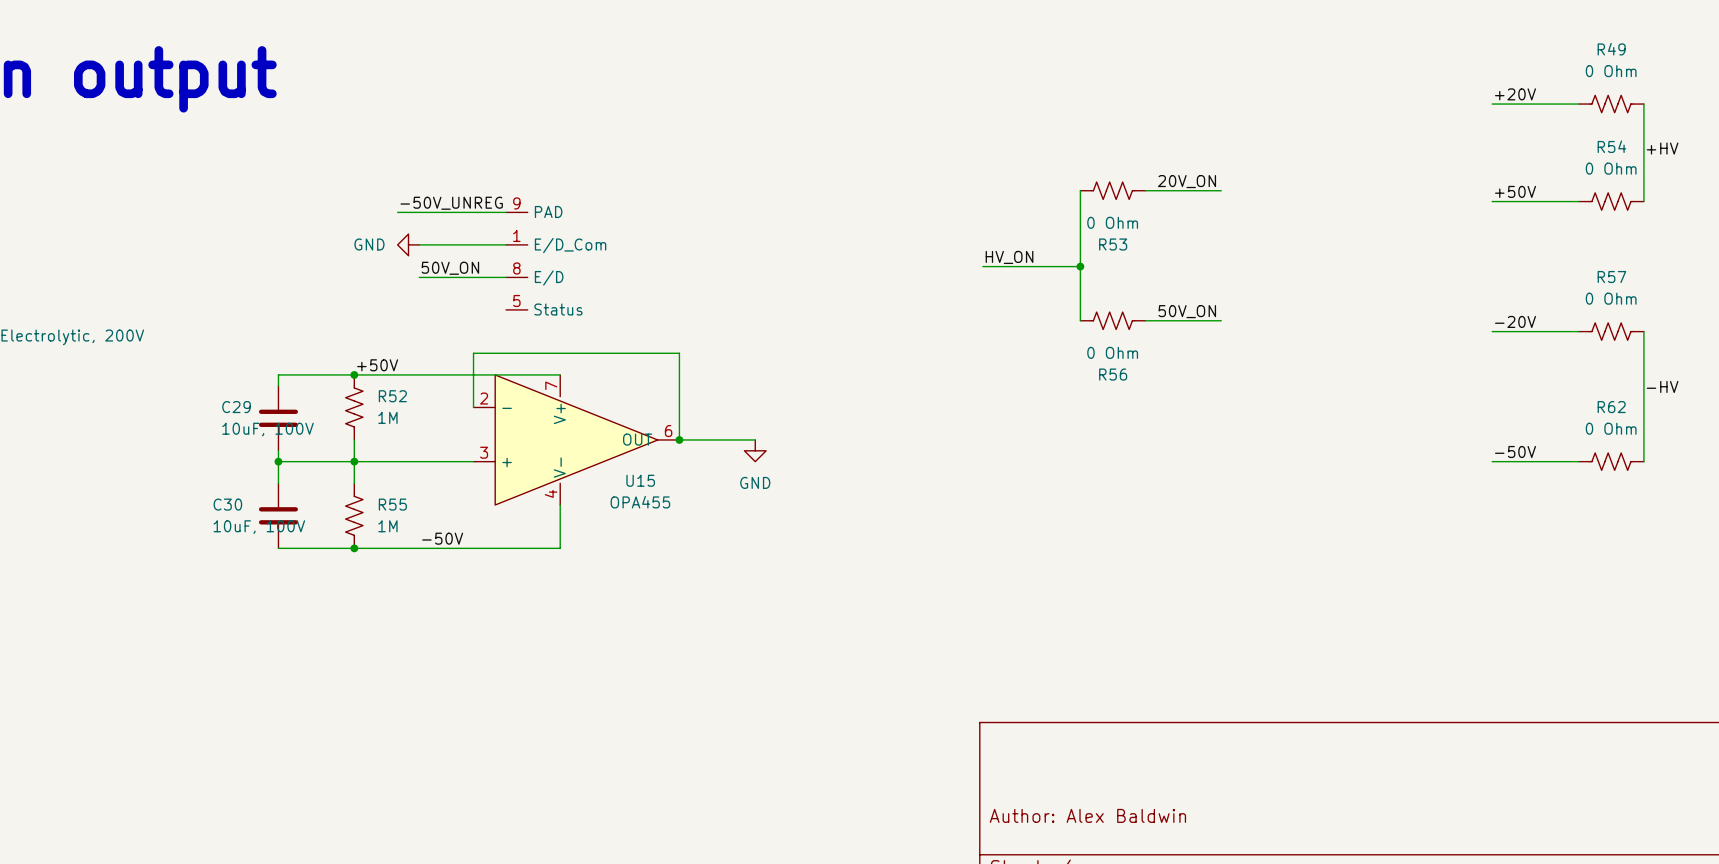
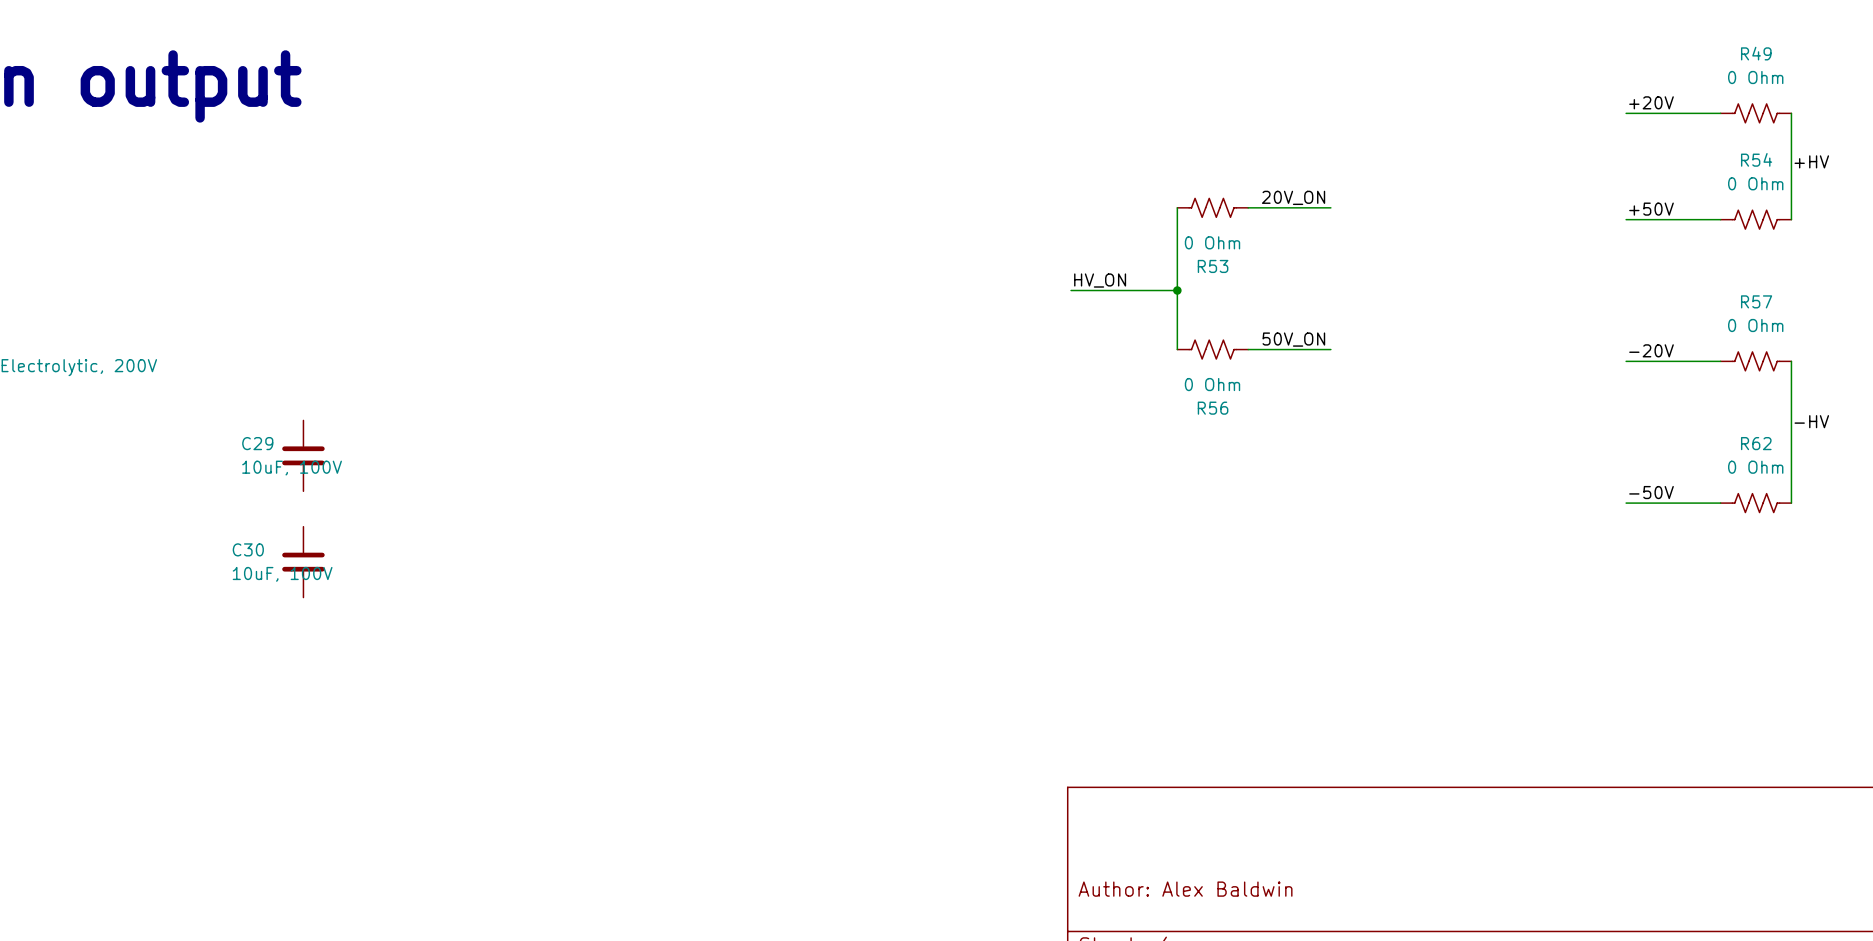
label: -50V_UNREG (451, 203) -> none
wire: (397, 212) (506, 212) -> none
power symbol: GND (408, 244) -> none
wire: (419, 244) (506, 244) -> none
label: 50V_ON (450, 268) -> none
wire: (419, 277) (506, 277) -> none
U15: OPA455 (576, 358) -> none
label: +50V (377, 365) -> none
junction: (354, 374) -> none
wire: (560, 374) (278, 374) (278, 385) -> none
R52: 1M (354, 407) -> none
wire: (473, 407) (473, 353) (679, 353) (679, 439) (755, 439) -> none
wire: (354, 439) (354, 483) -> none
junction: (679, 439) -> none
wire: (278, 450) (278, 483) -> none
power symbol: GND (755, 450) -> none
wire: (278, 461) (473, 461) -> none
junction: (278, 461) -> none
junction: (354, 461) -> none
wire: (560, 505) (560, 548) (278, 548) -> none
R55: 1M (354, 515) -> none
label: -50V (442, 538) -> none
junction: (354, 548) -> none

